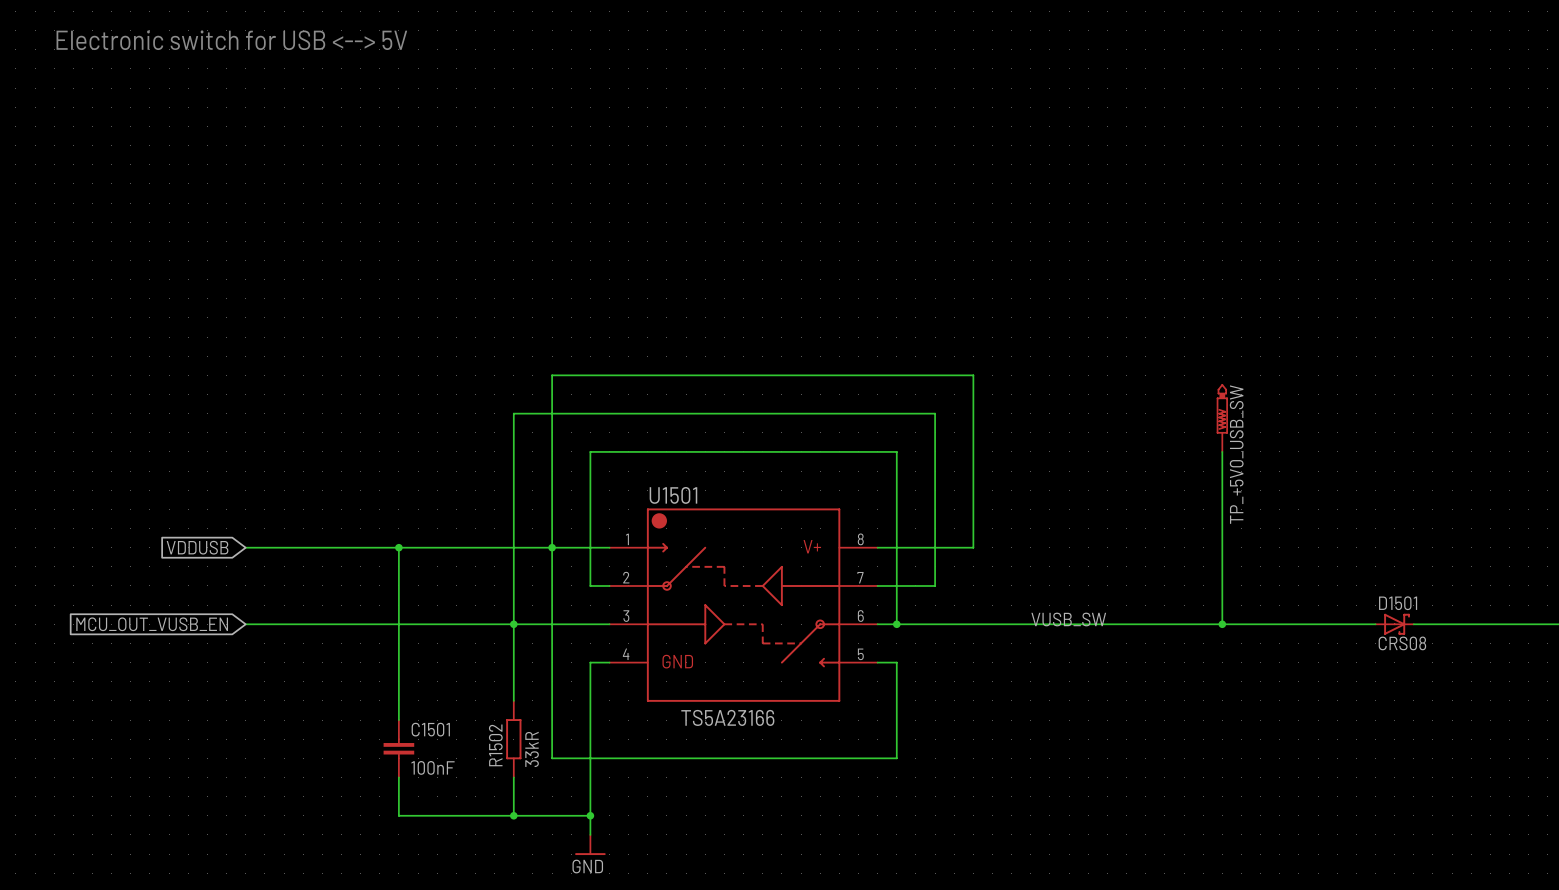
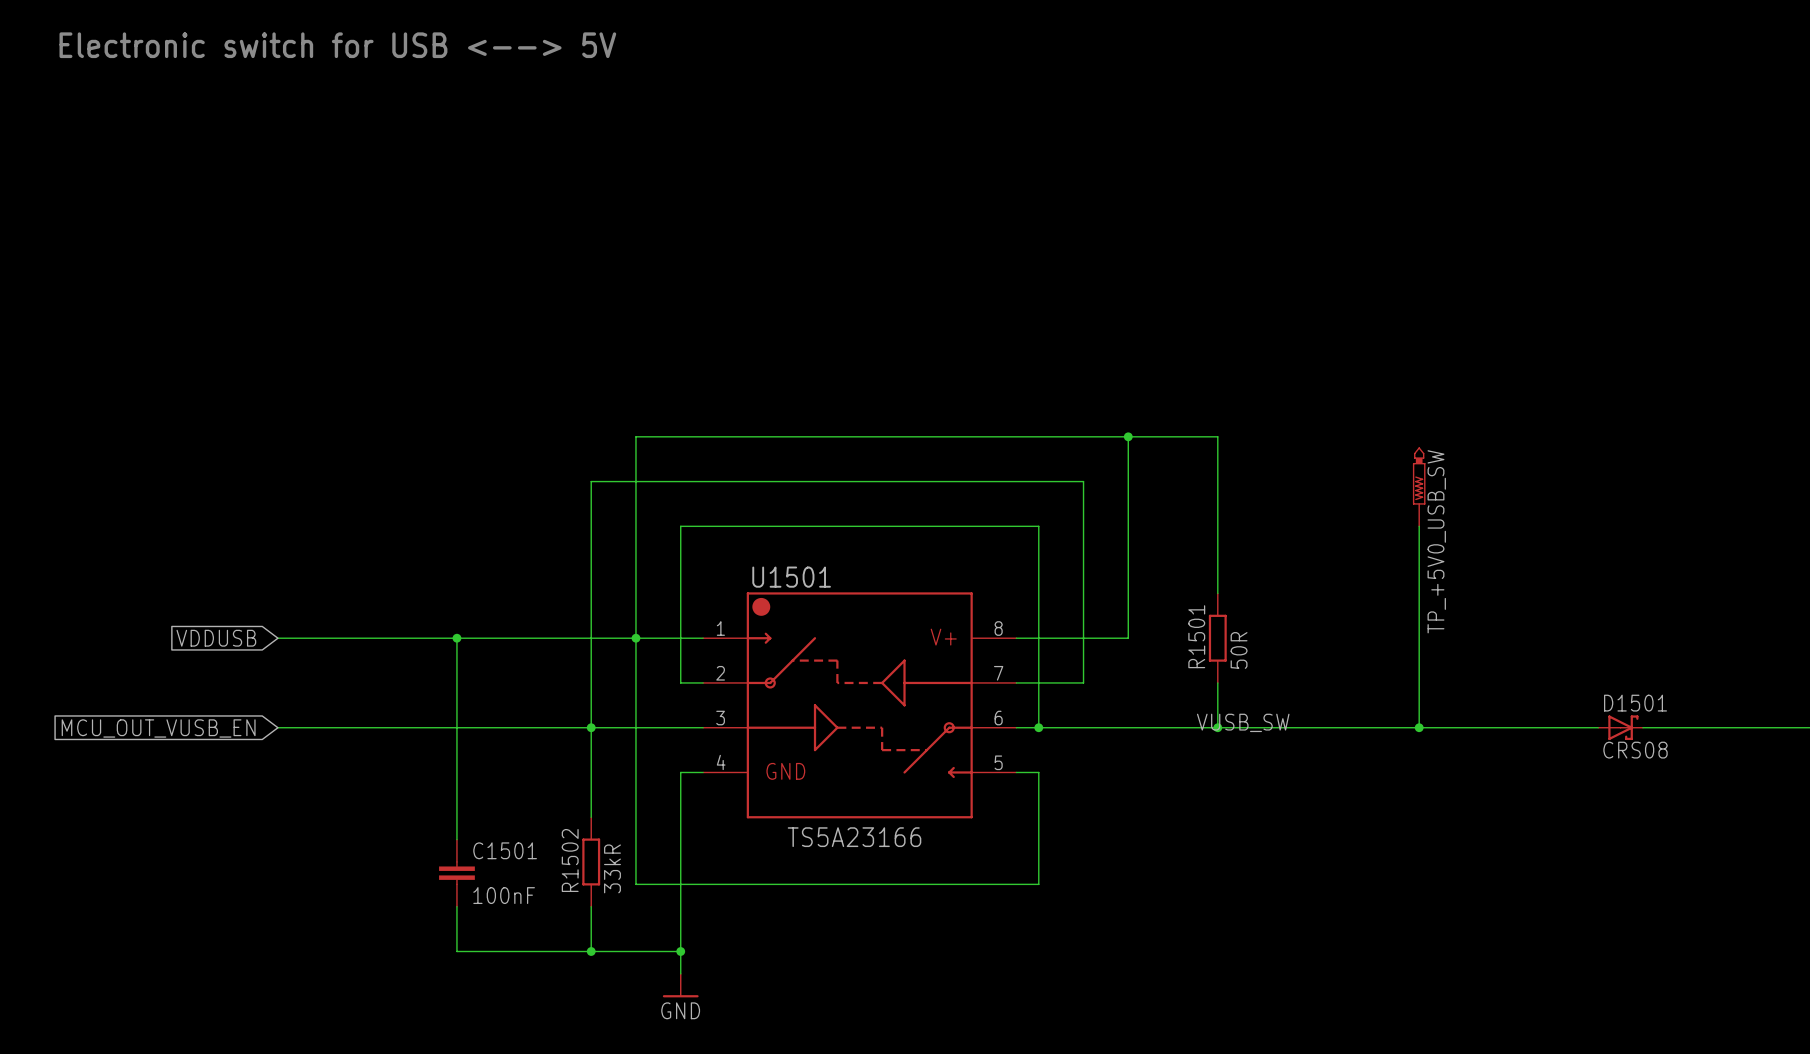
wire: none -> (1128, 436) (1217, 436) (1217, 593)
junction: none -> (1128, 436)
R1501: none -> 50R (1217, 638)
wire: none -> (1217, 682) (1217, 727)
junction: none -> (1217, 727)

